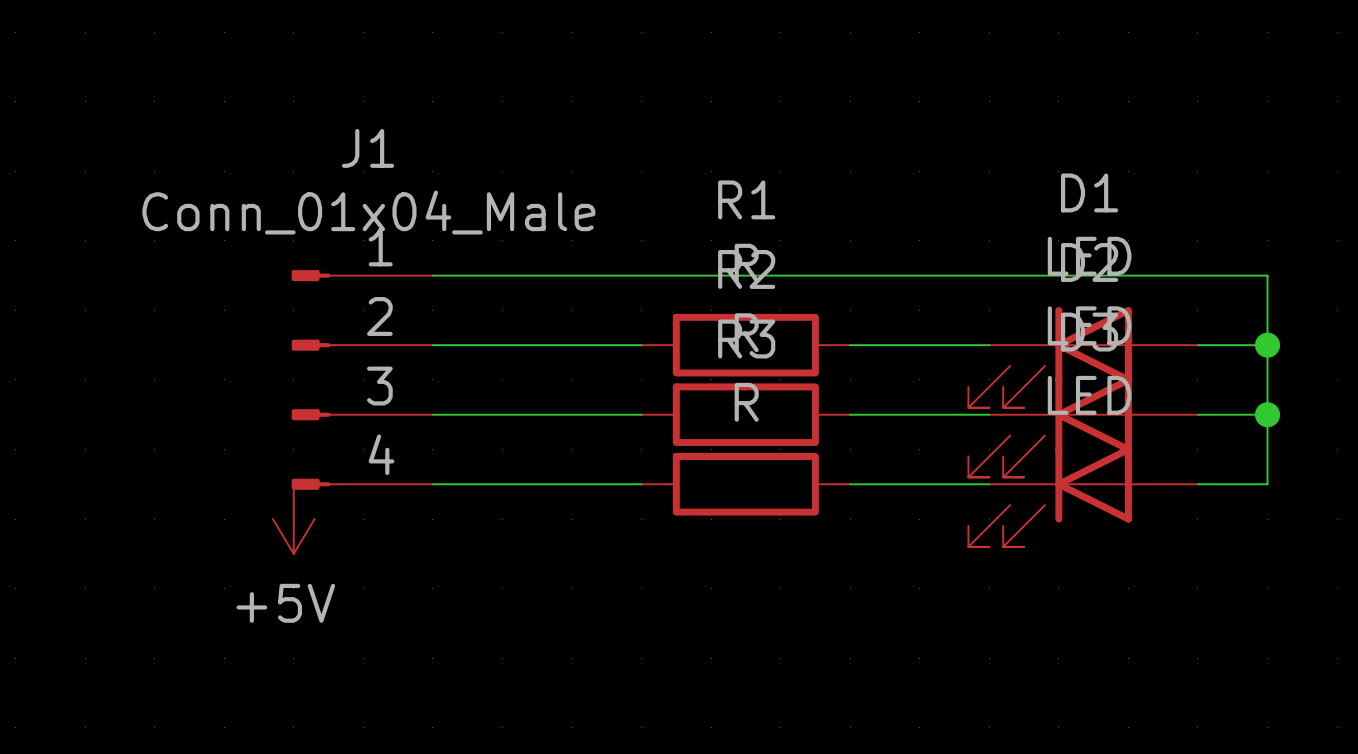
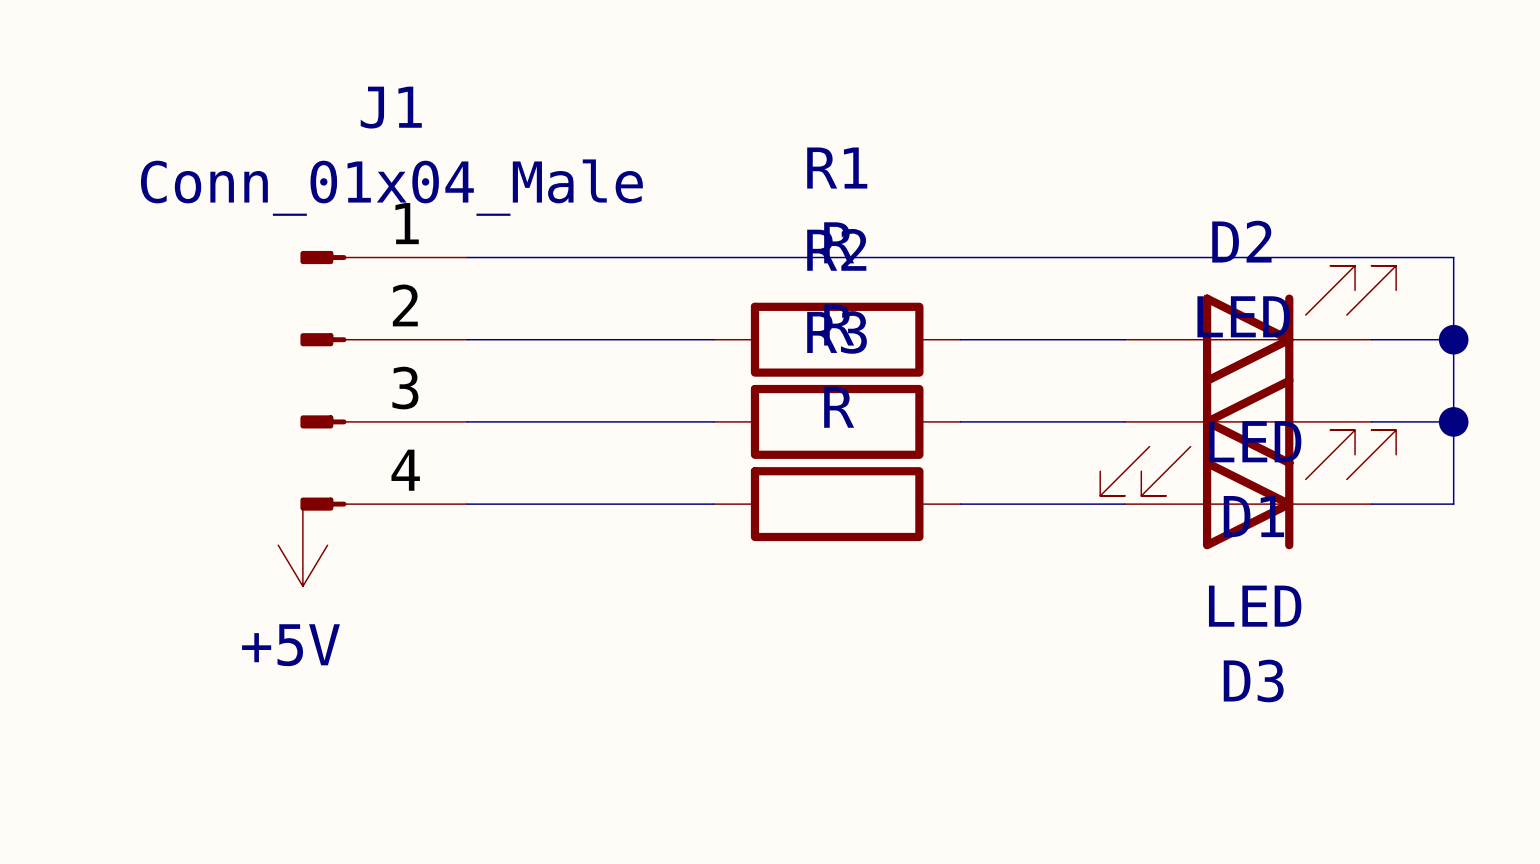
D1 rotation: 0° (1050, 357) -> 180° (1299, 325)
D3 rotation: 0° (1050, 496) -> 180° (1299, 489)

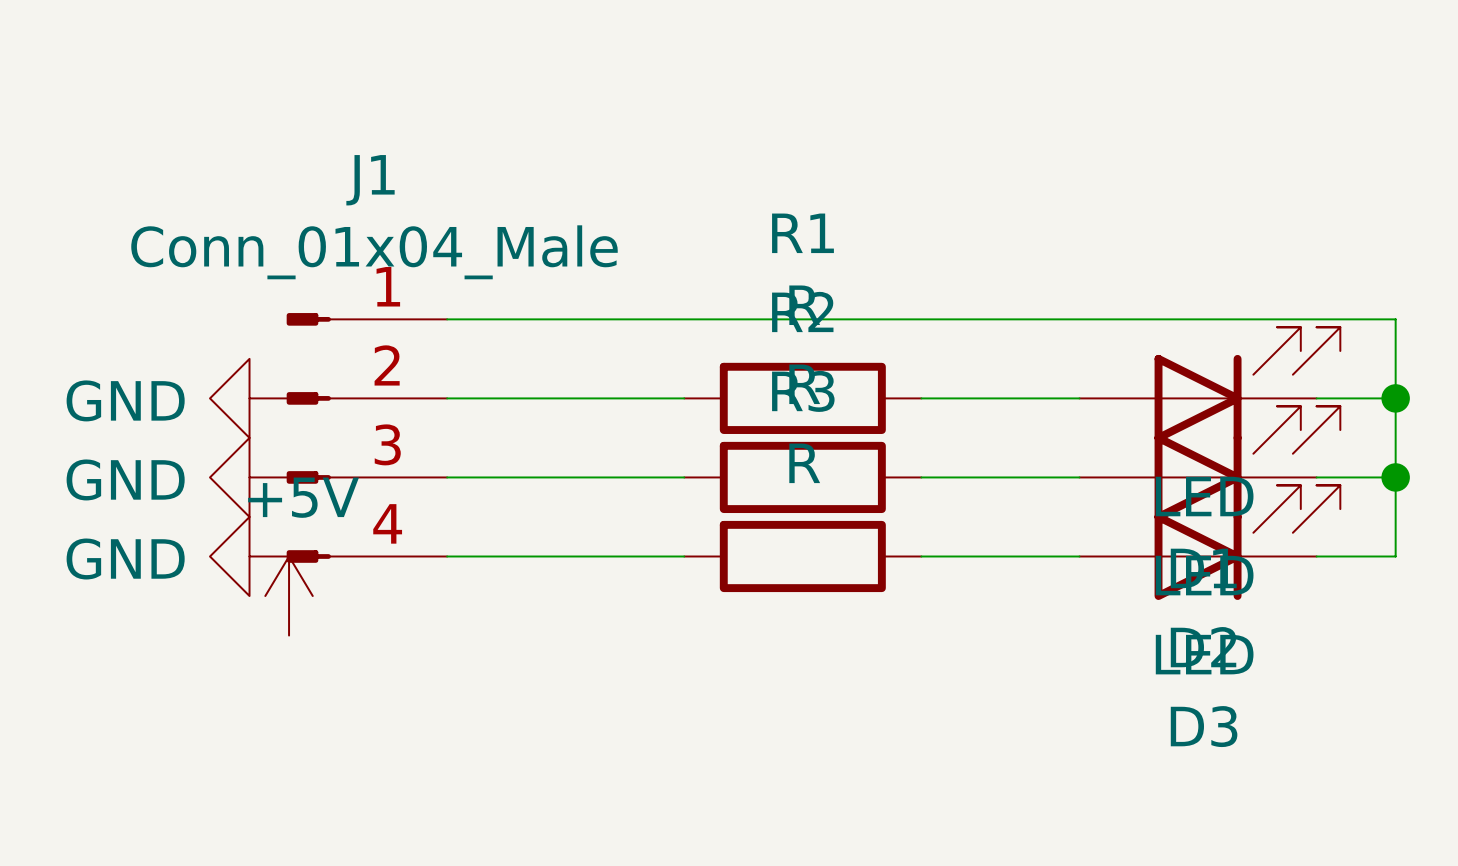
power symbol: none -> GND (249, 398)
power symbol: none -> GND (249, 477)
D2 rotation: 0° (1196, 436) -> 180° (1247, 463)
power symbol: none -> GND (249, 556)
power symbol rotation: 0° (302, 545) -> 180° (289, 596)

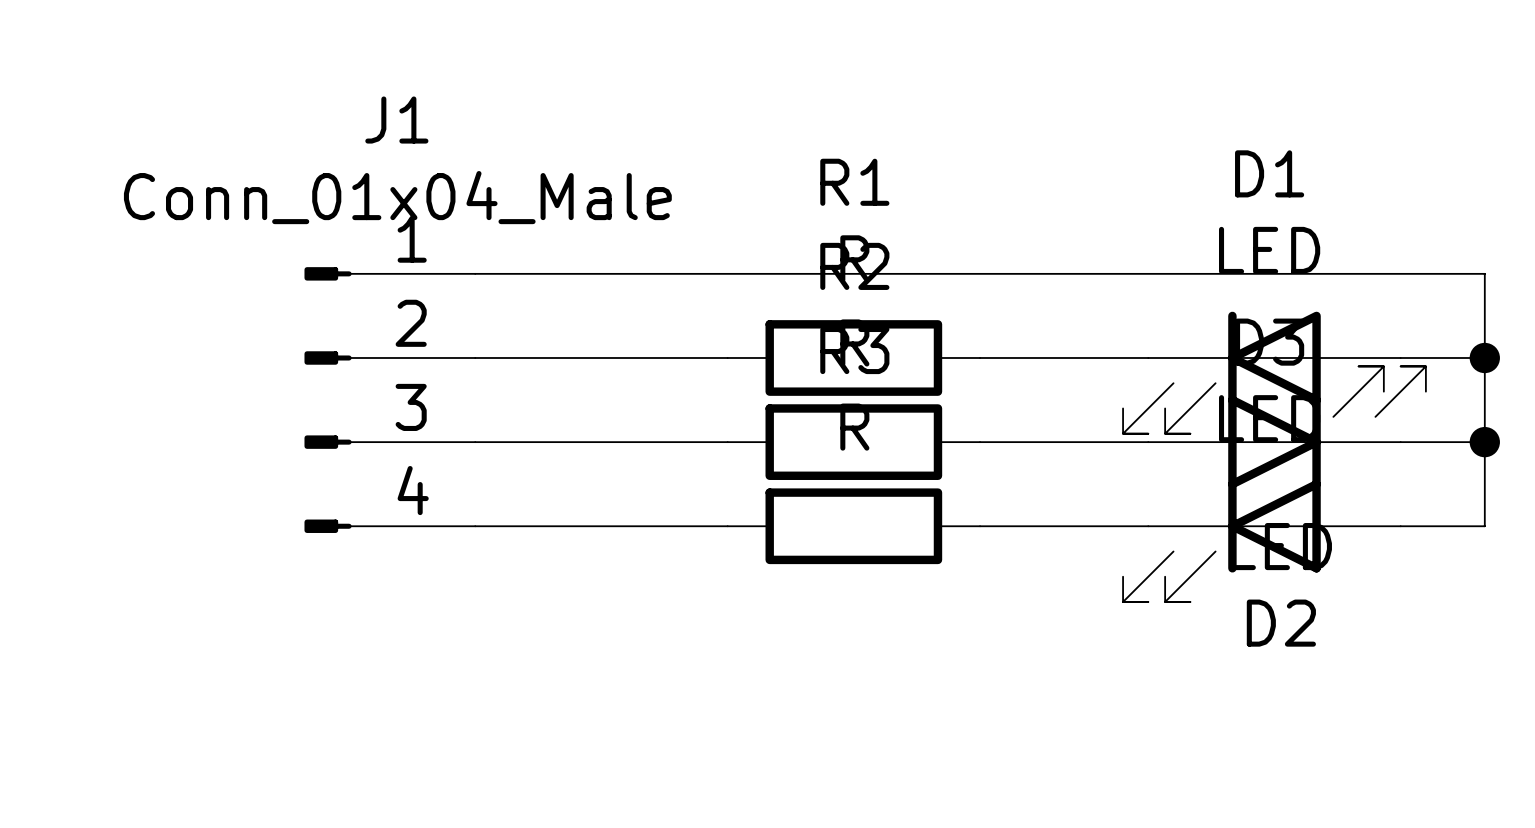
D1 rotation: 0° (1247, 384) -> 180° (1221, 372)
power symbol: GND (249, 398) -> none
power symbol: GND (249, 477) -> none
D3 rotation: 0° (1247, 542) -> 180° (1221, 540)
power symbol: GND (249, 556) -> none
power symbol: +5V (289, 596) -> none

